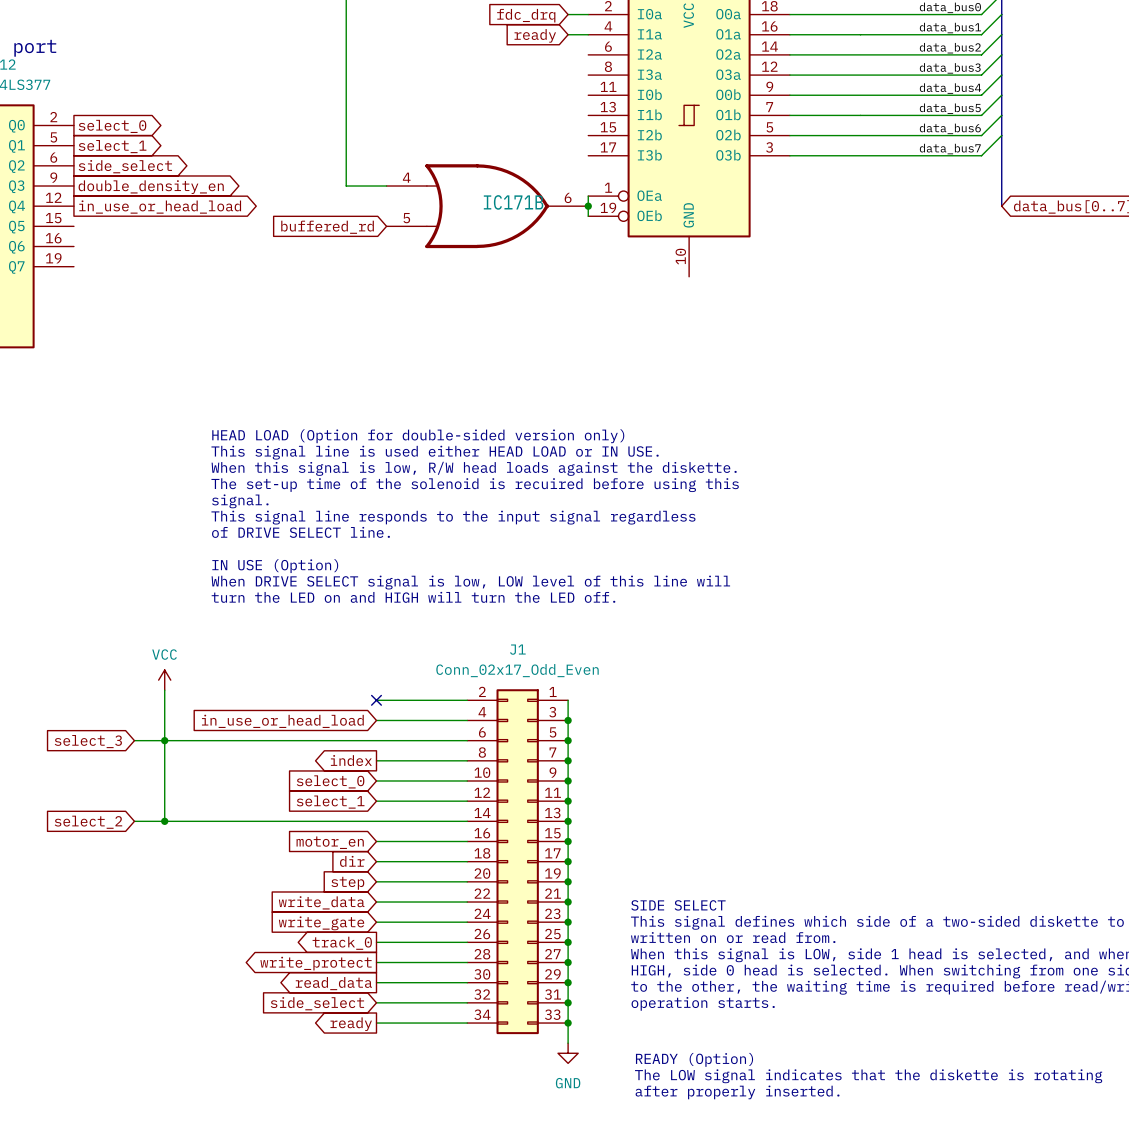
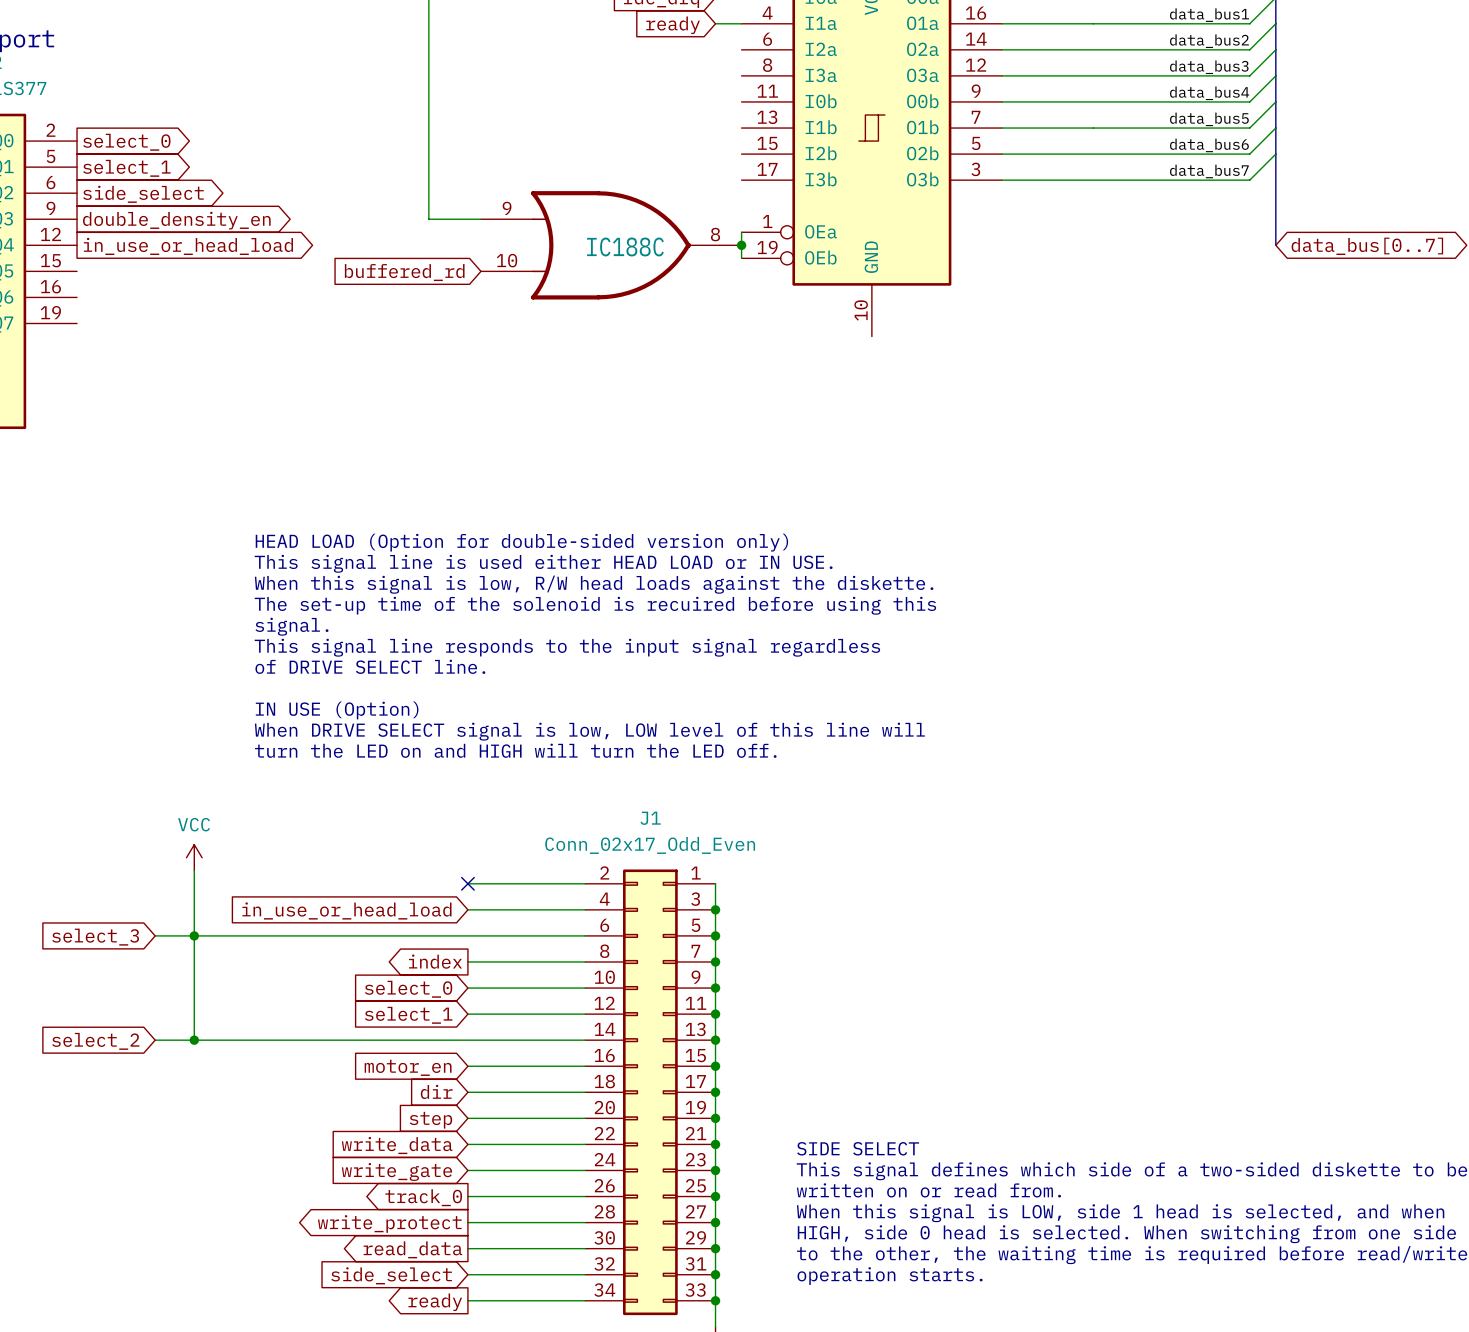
IC171B pin number: 4 (406, 177) -> 9 (507, 208)
IC171B pin number: 6 (568, 197) -> 8 (715, 234)
IC171B name: IC171B (513, 202) -> IC188C (625, 246)
IC171B pin number: 5 (406, 218) -> 10 (507, 260)

